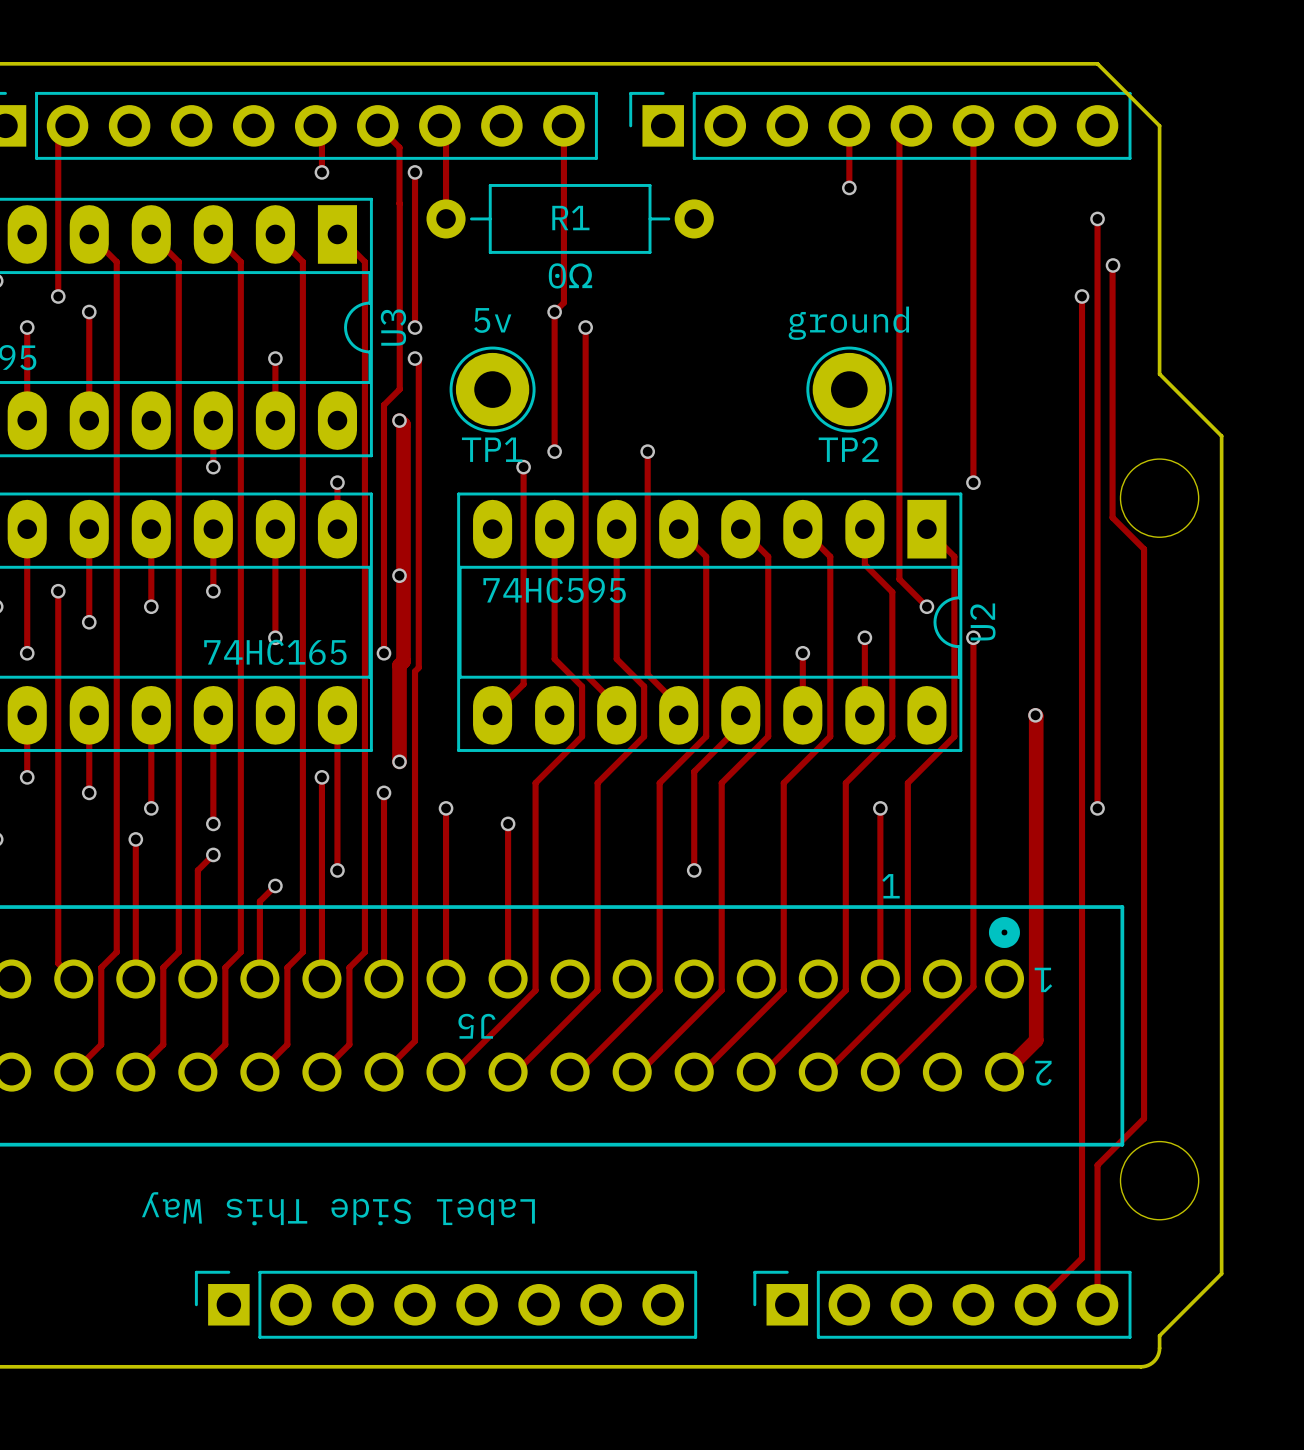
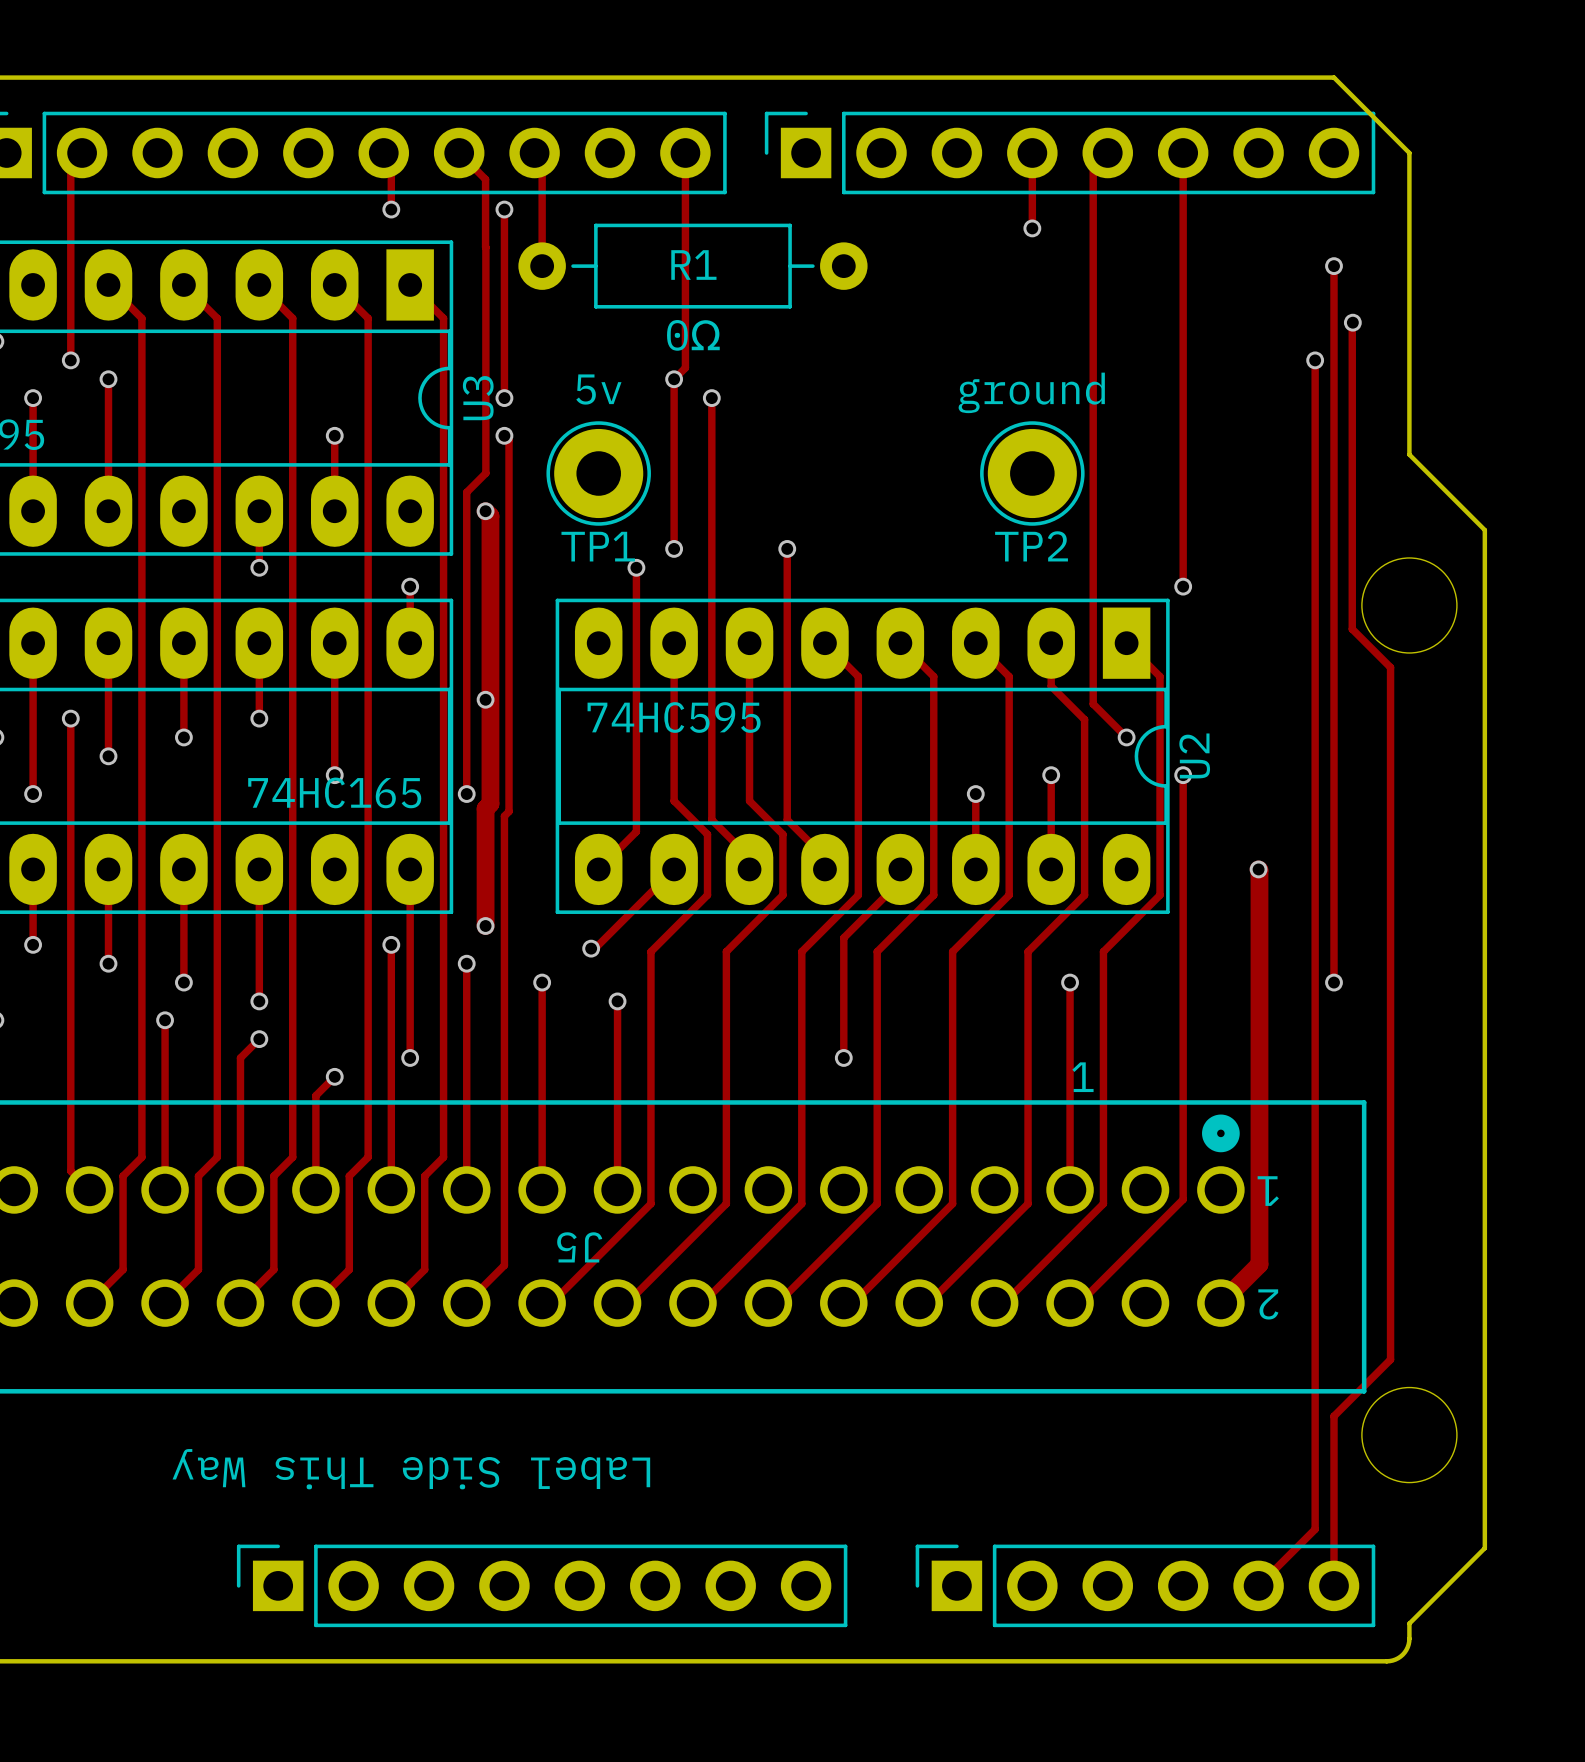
track: none -> (674, 869) (594, 948) (591, 948)
via: none -> (591, 948)

